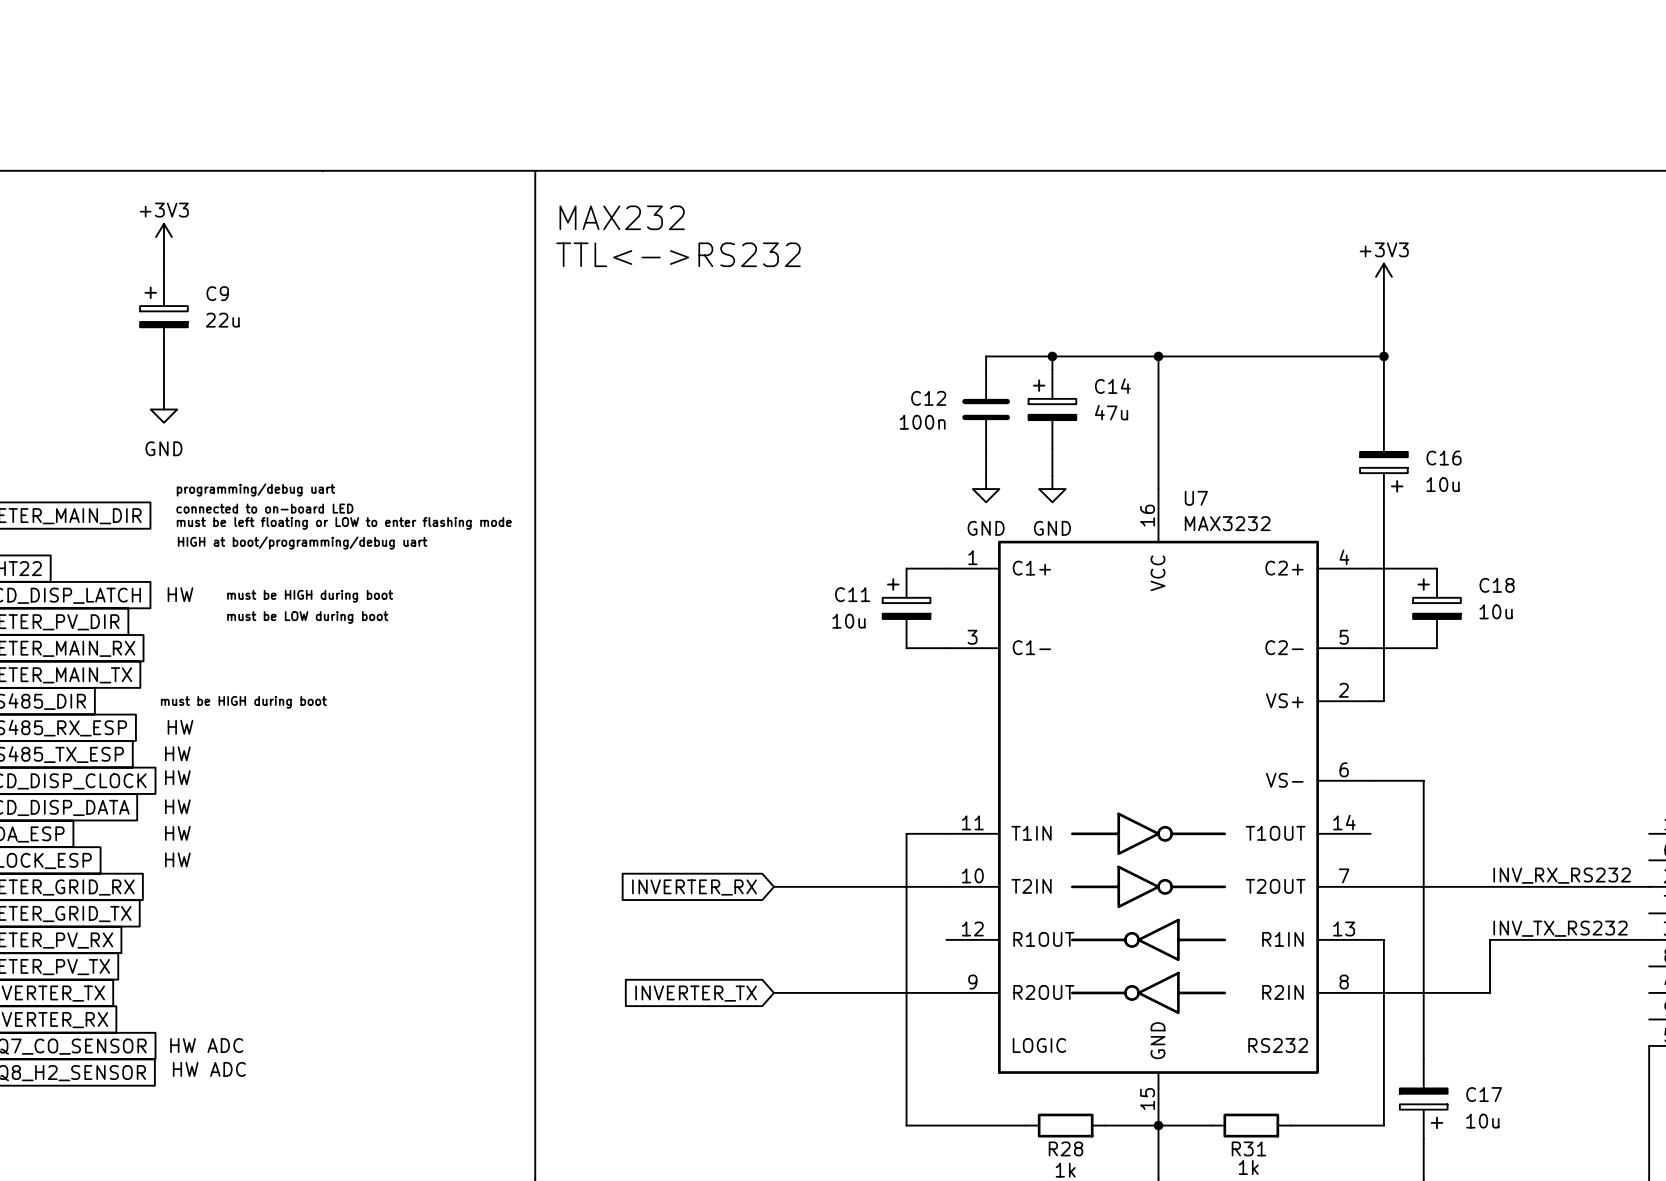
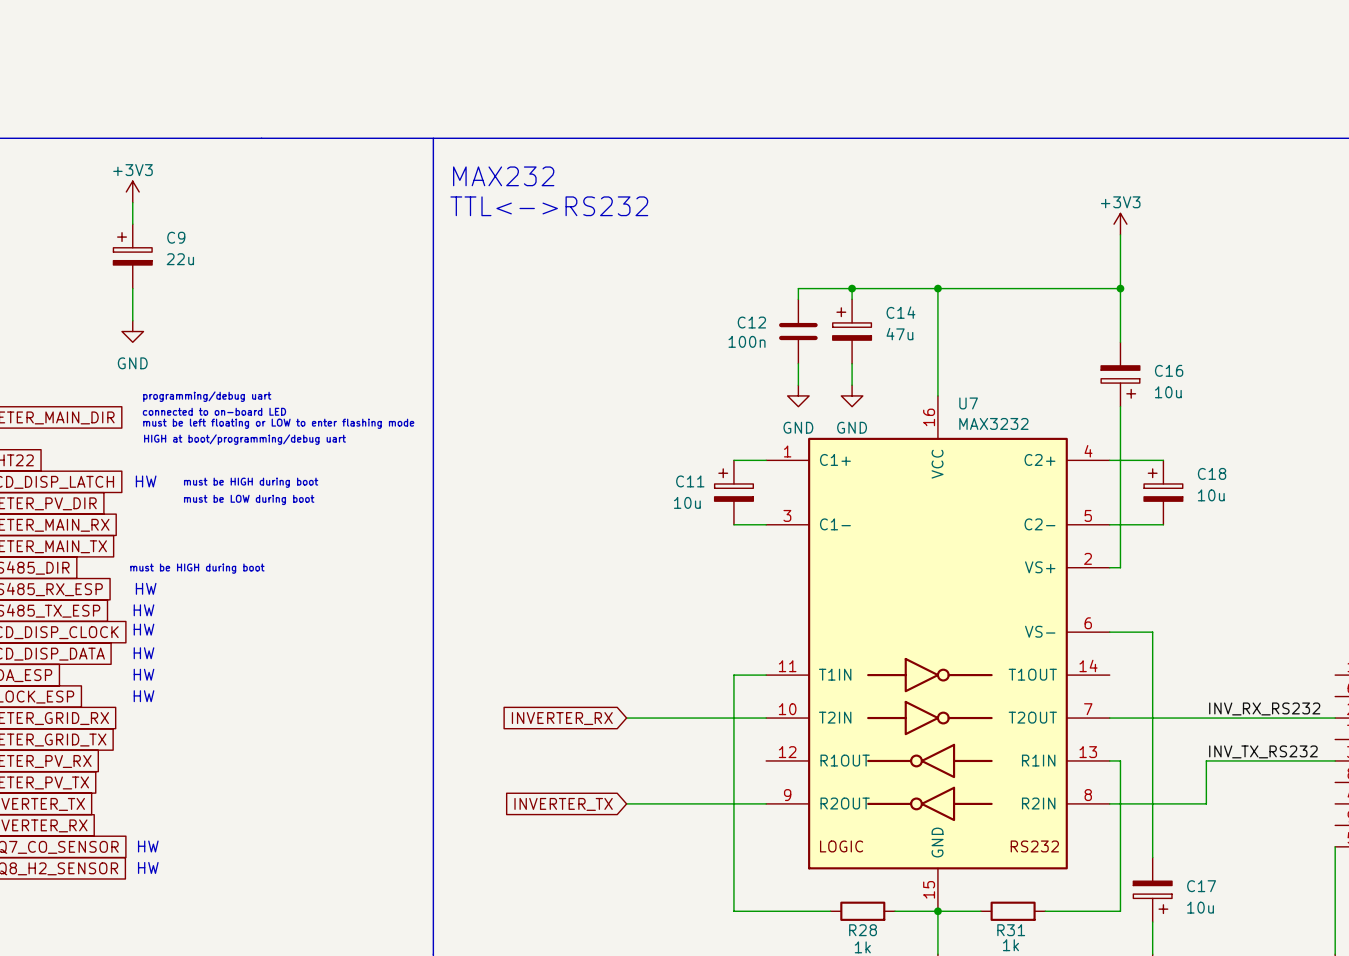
text: HW ADC (206, 1045) -> none
text: HW ADC (209, 1069) -> none
text: none -> HW (148, 867)

